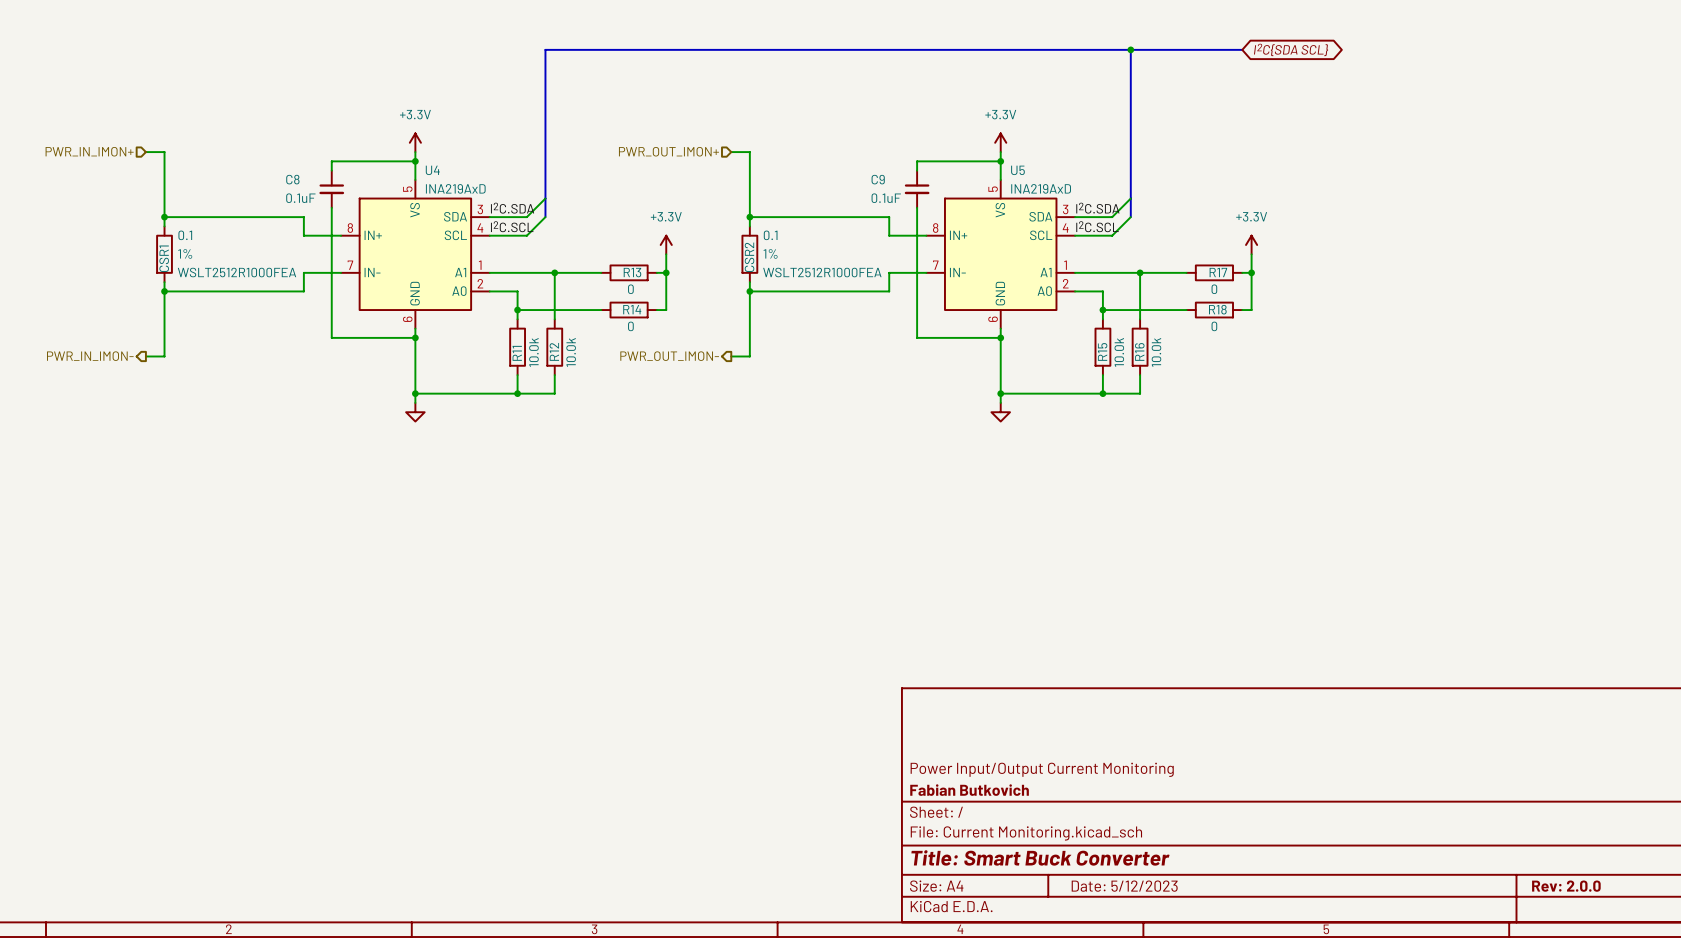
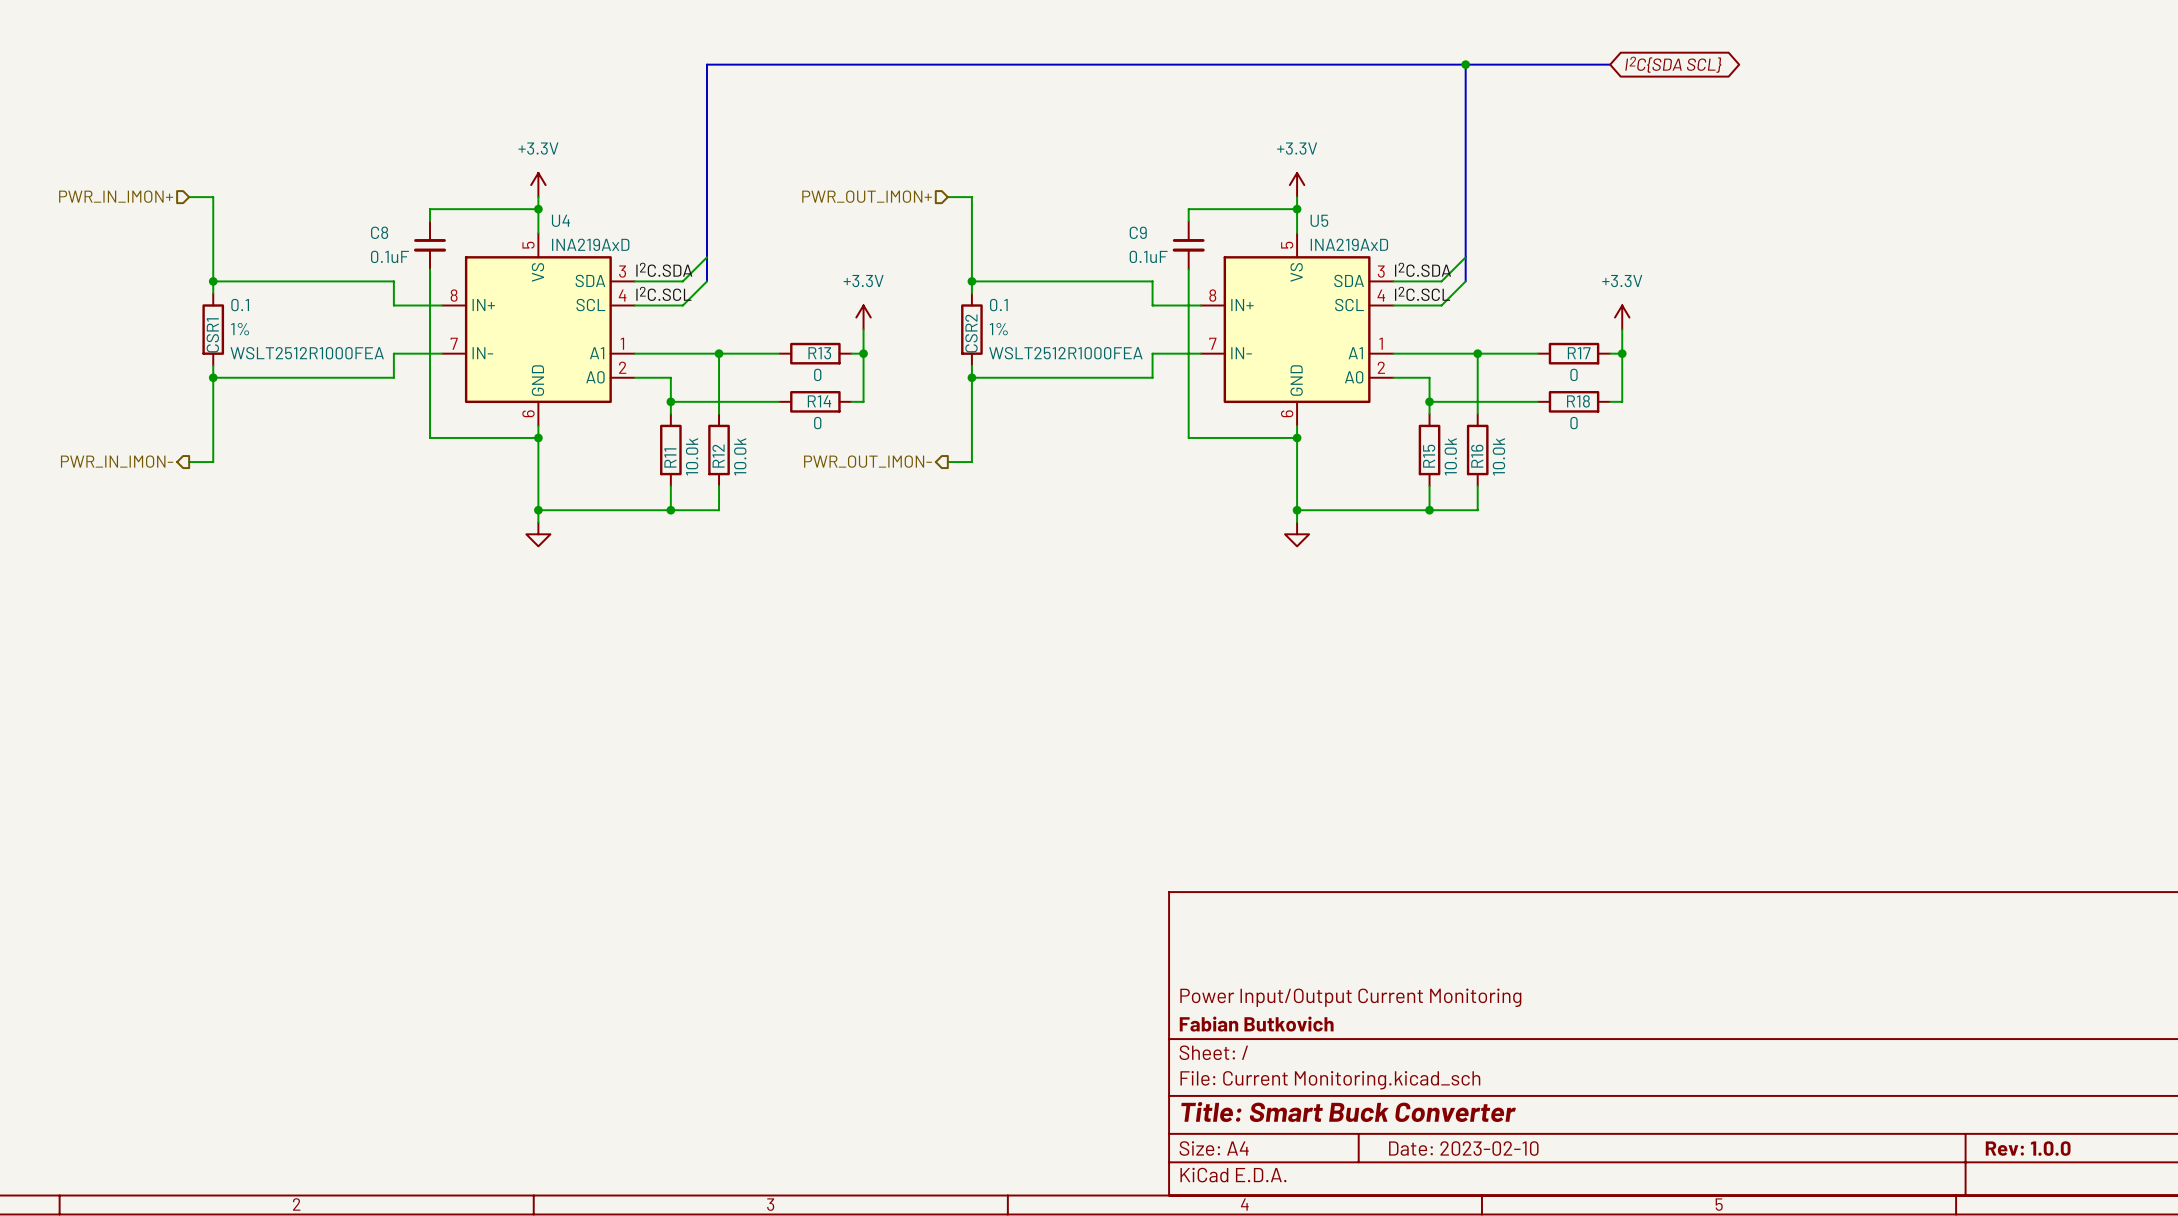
title block: Date: 5/12/2023 (1124, 886) -> Date: 2023-02-10 (1463, 1148)
title block: Rev: 2.0.0 (1566, 886) -> Rev: 1.0.0 (2028, 1148)

